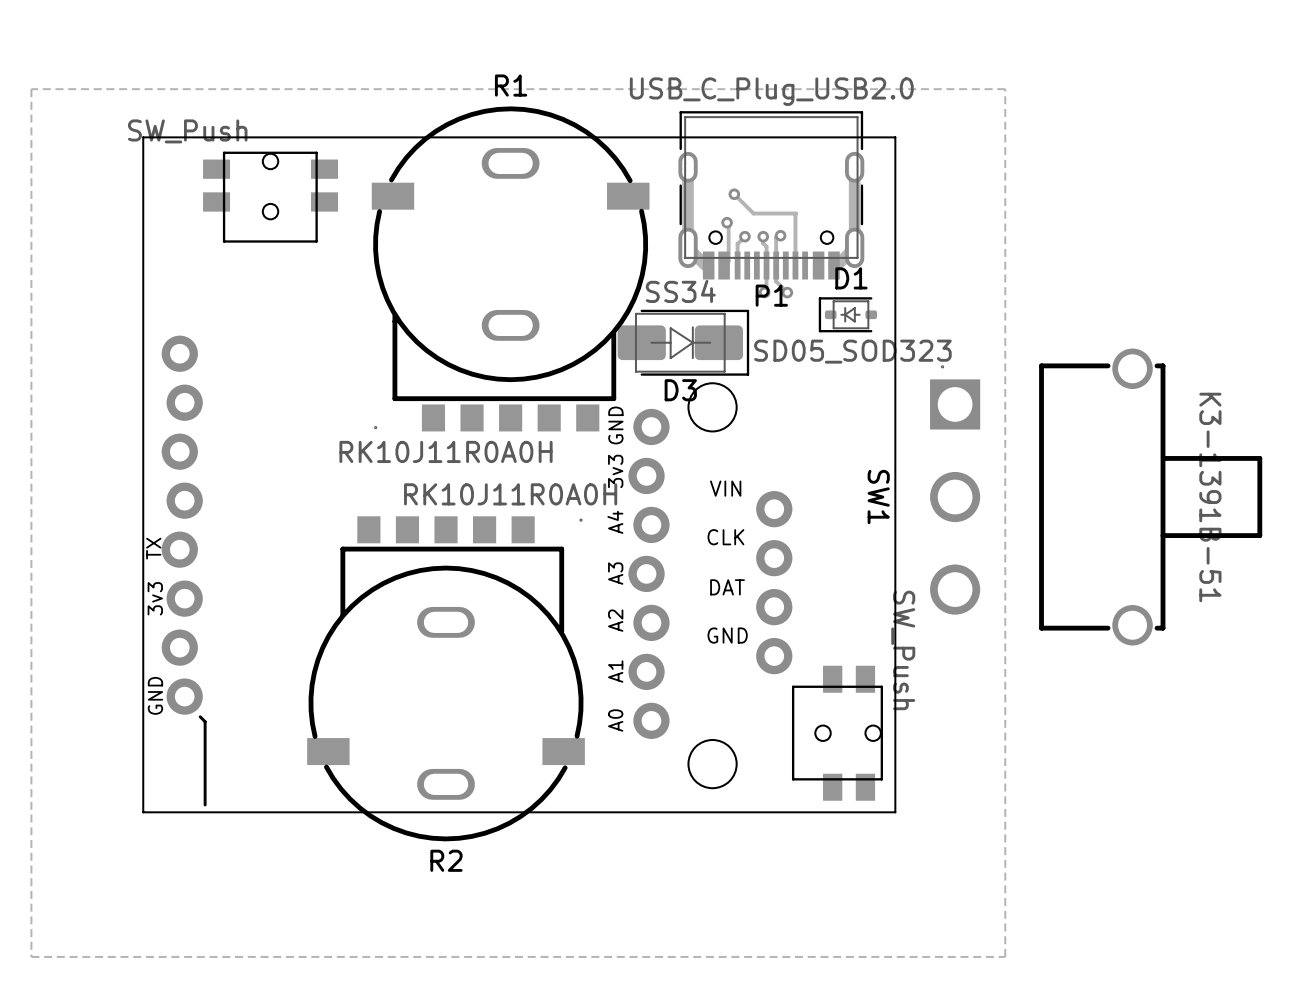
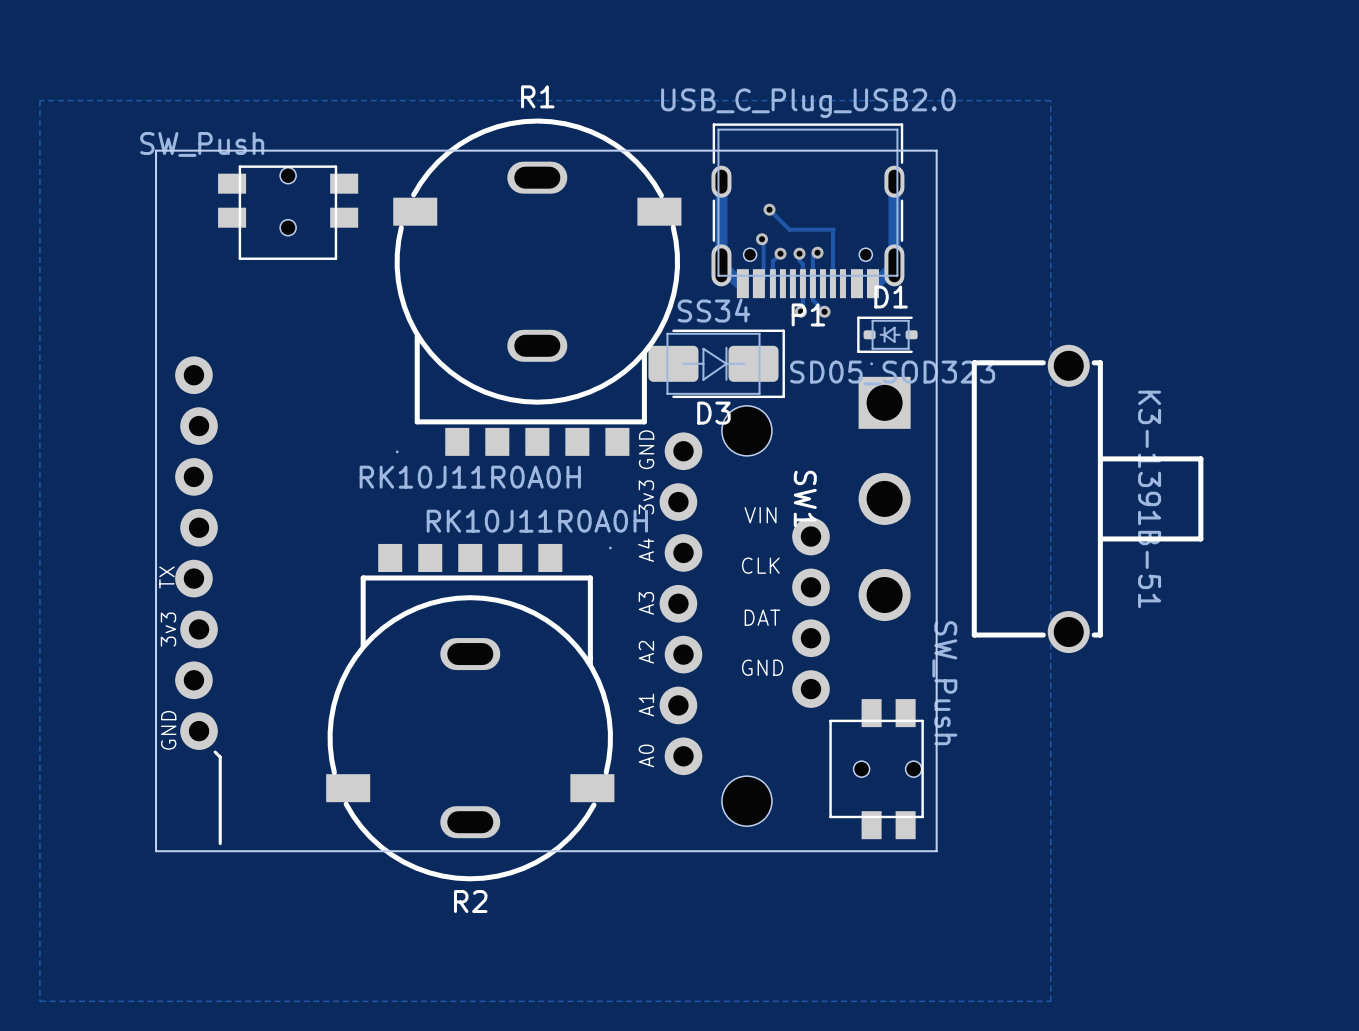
SW1 position: (1096, 497) -> (1030, 498)

